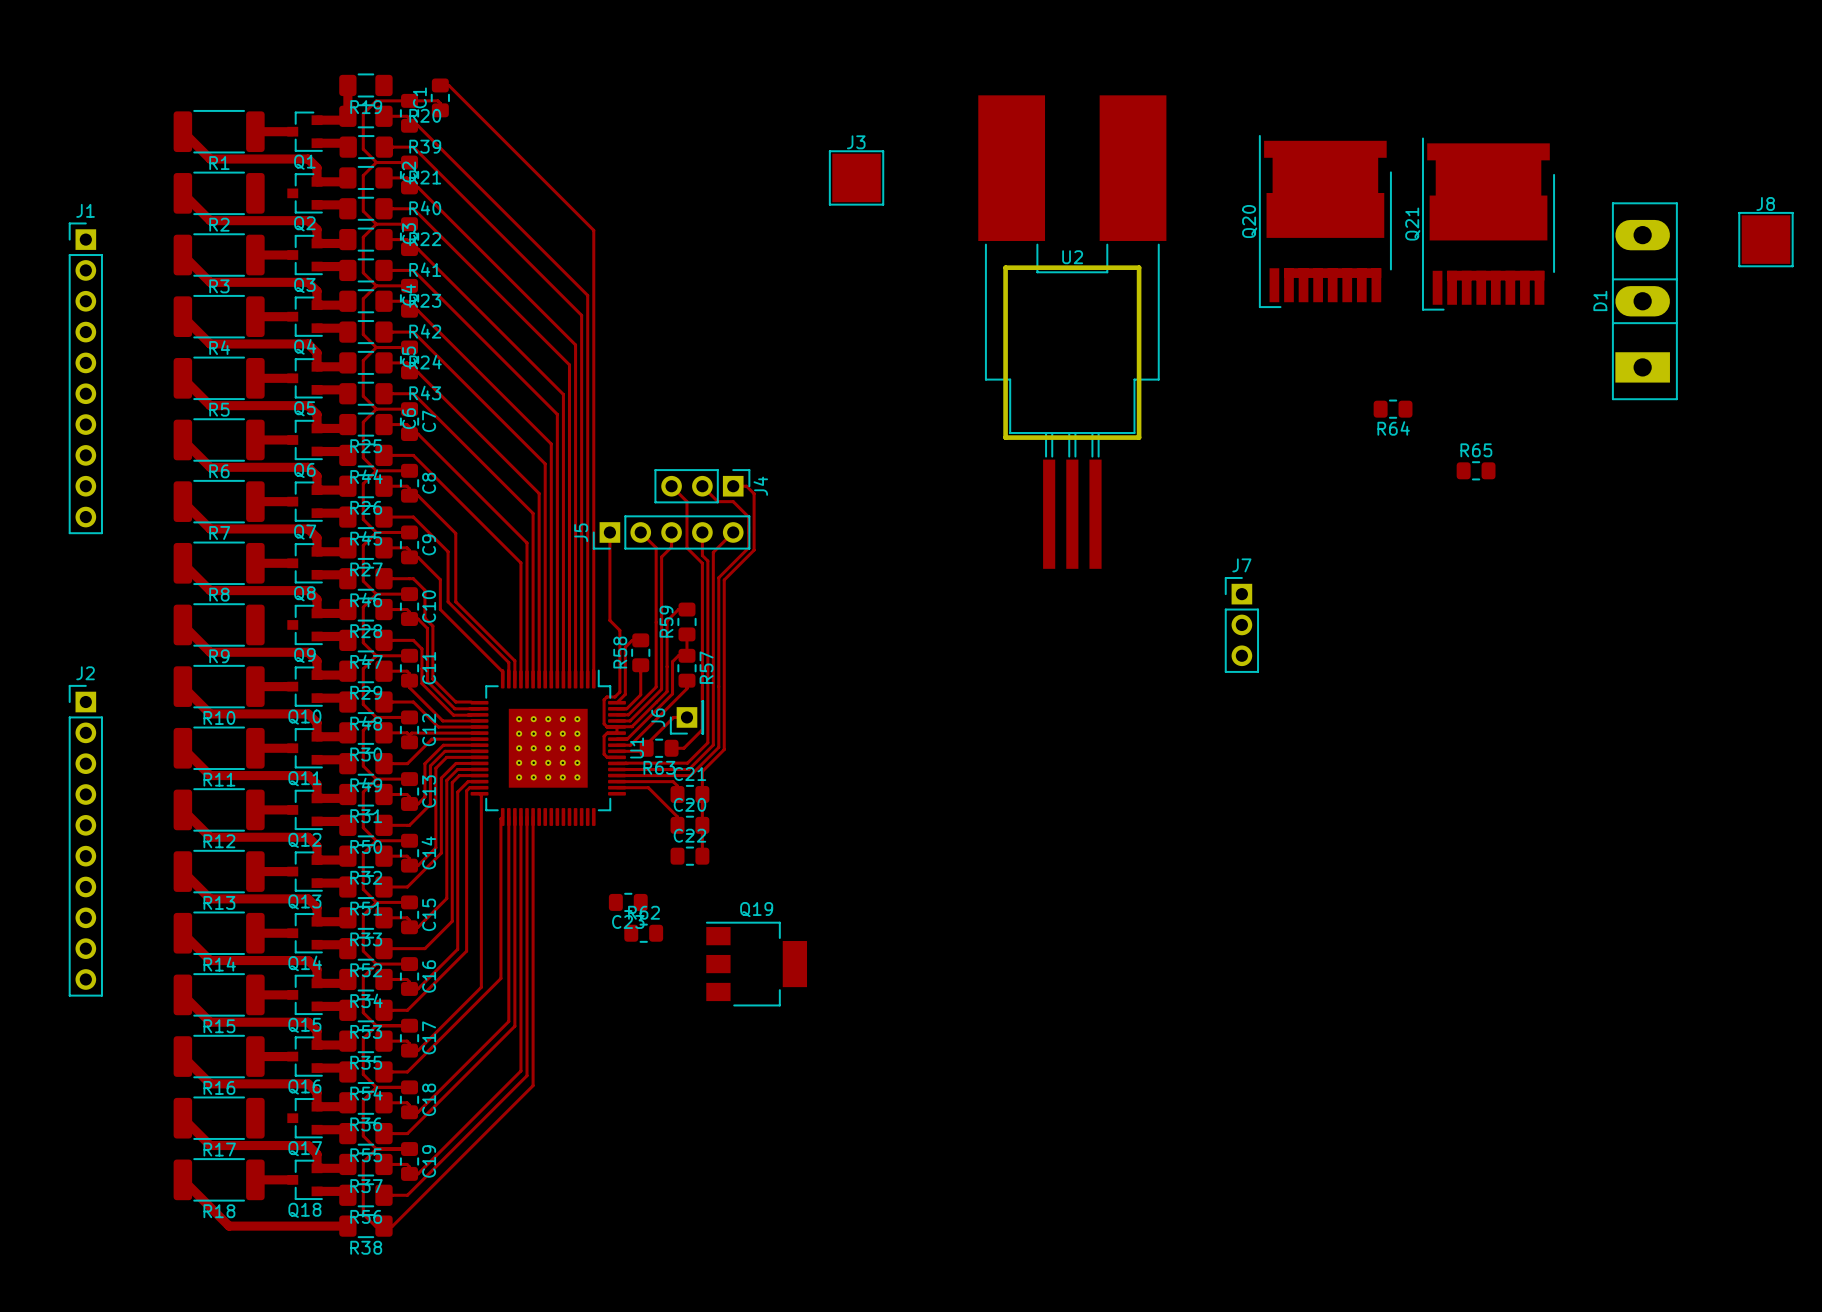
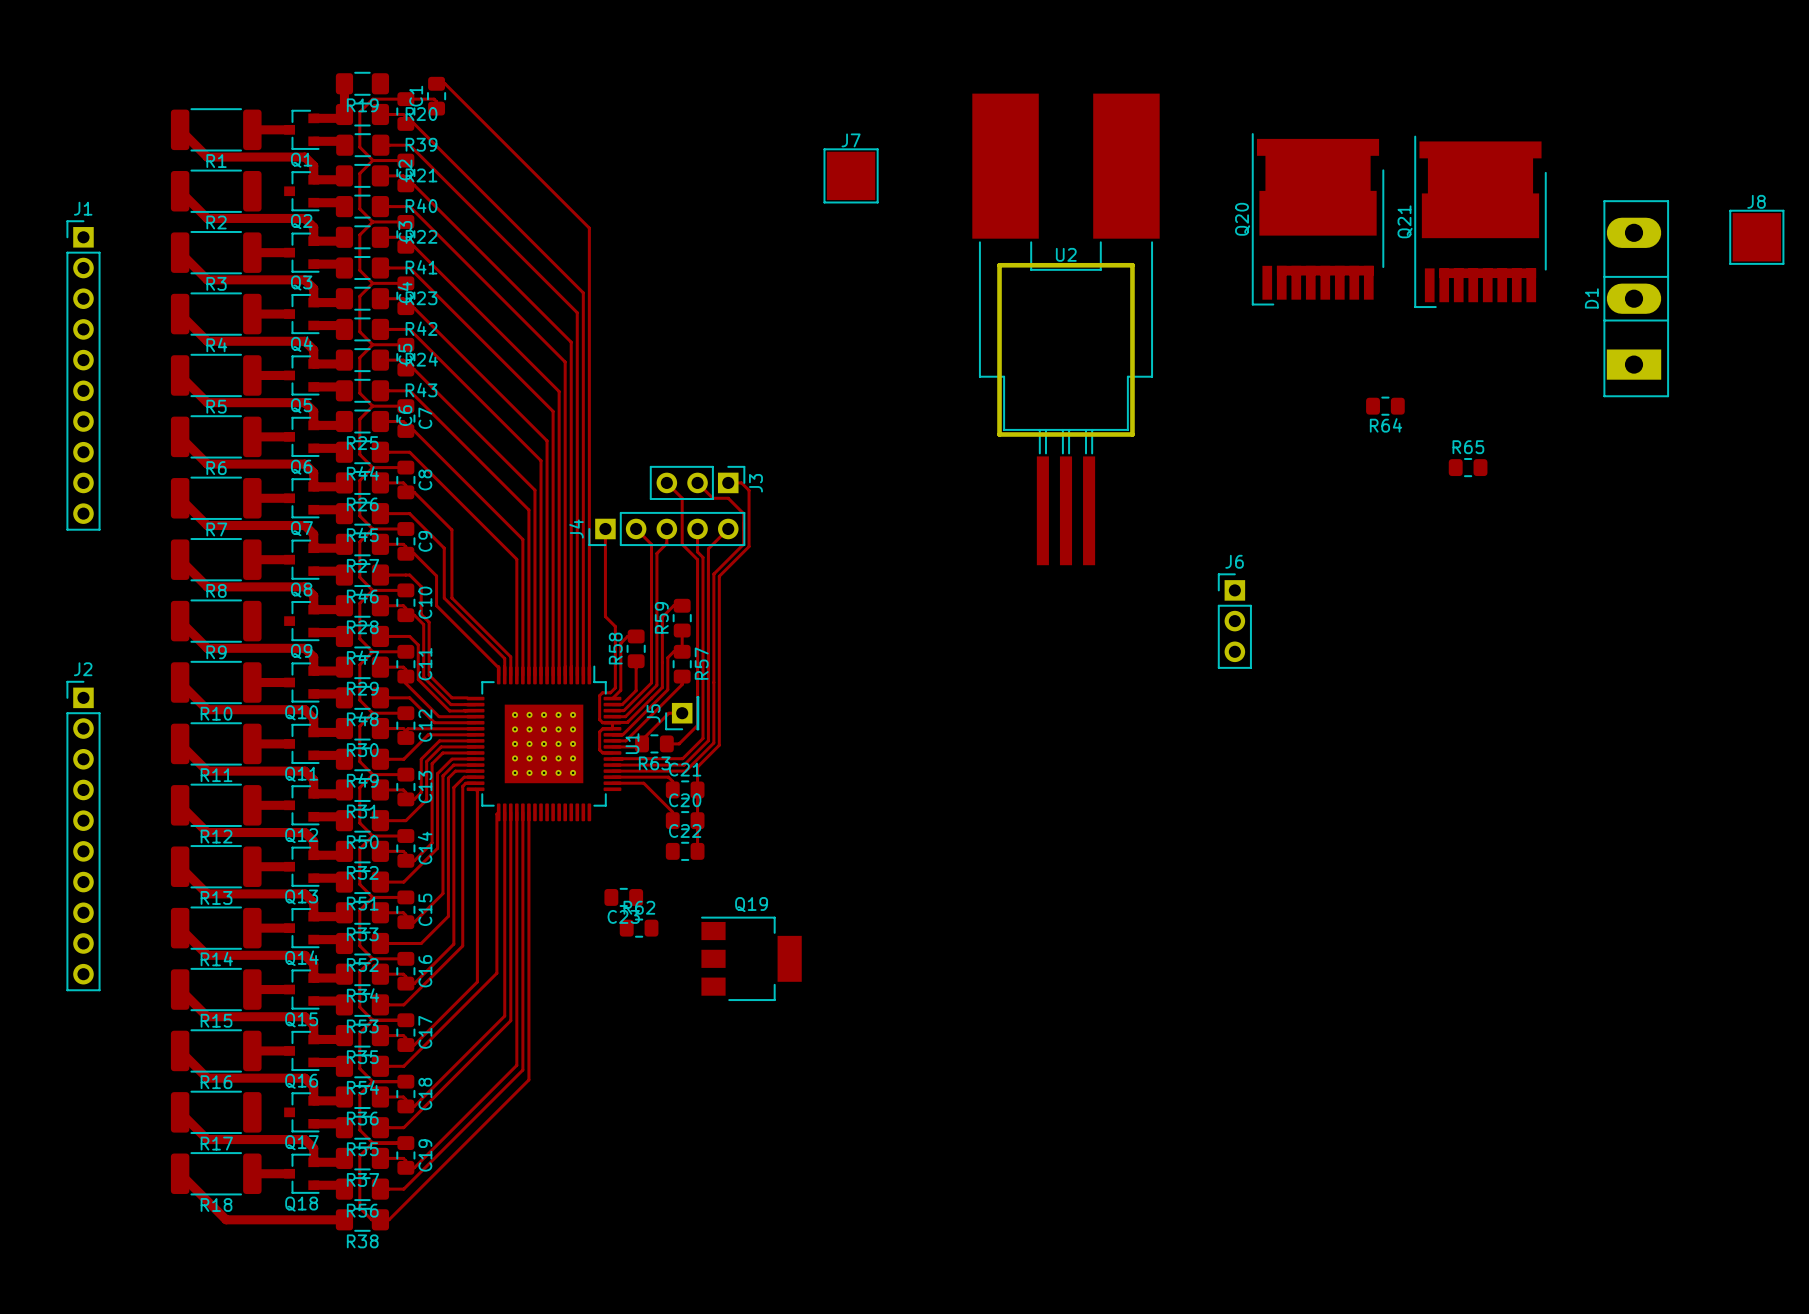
J3 name: J3 (856, 142) -> J7 (851, 140)
J4 name: J4 (760, 486) -> J3 (755, 483)
J5 name: J5 (581, 532) -> J4 (576, 528)
J7 name: J7 (1241, 565) -> J6 (1234, 561)
J6 name: J6 (658, 717) -> J5 (653, 713)

